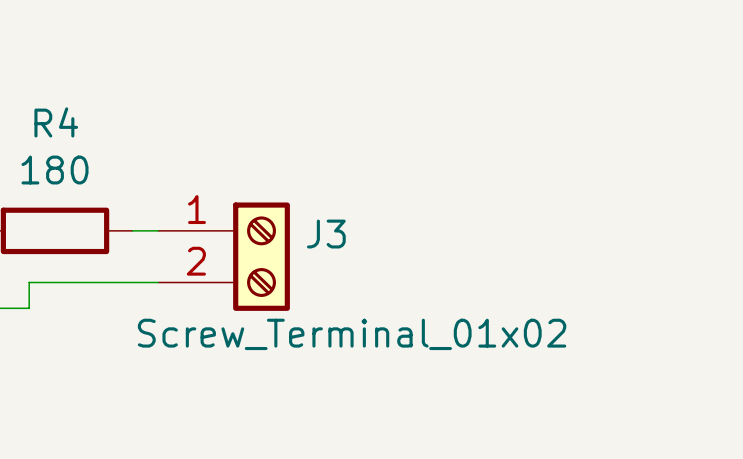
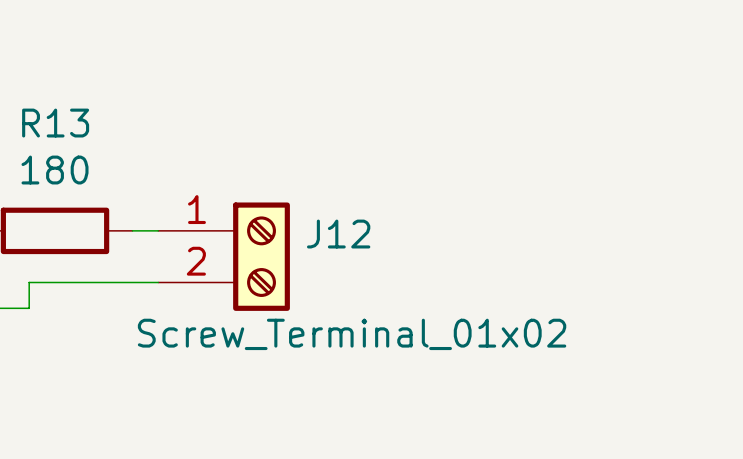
R4 name: R4 (56, 122) -> R13 (55, 123)
J3 name: J3 (326, 234) -> J12 (338, 234)

